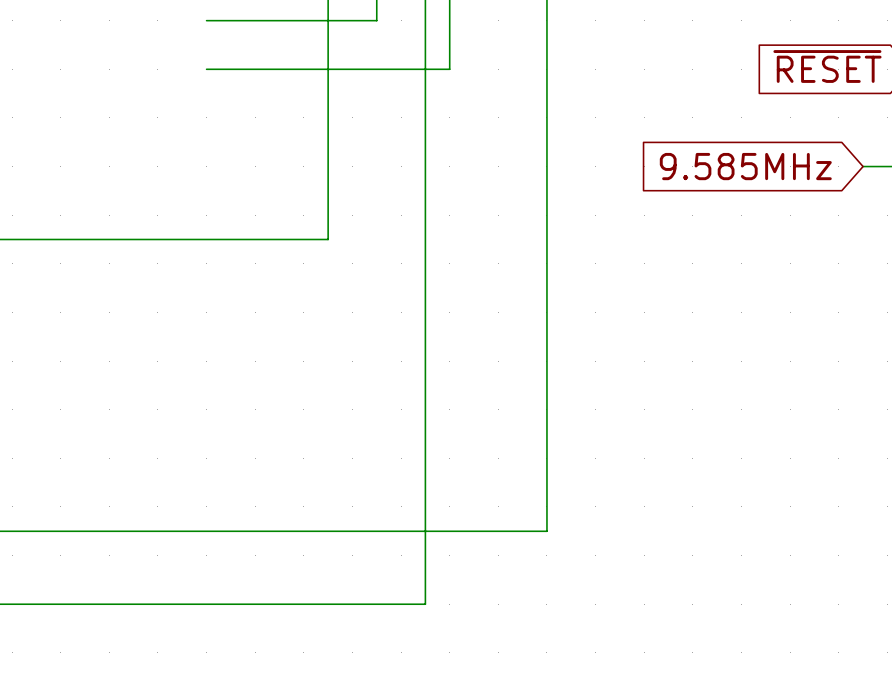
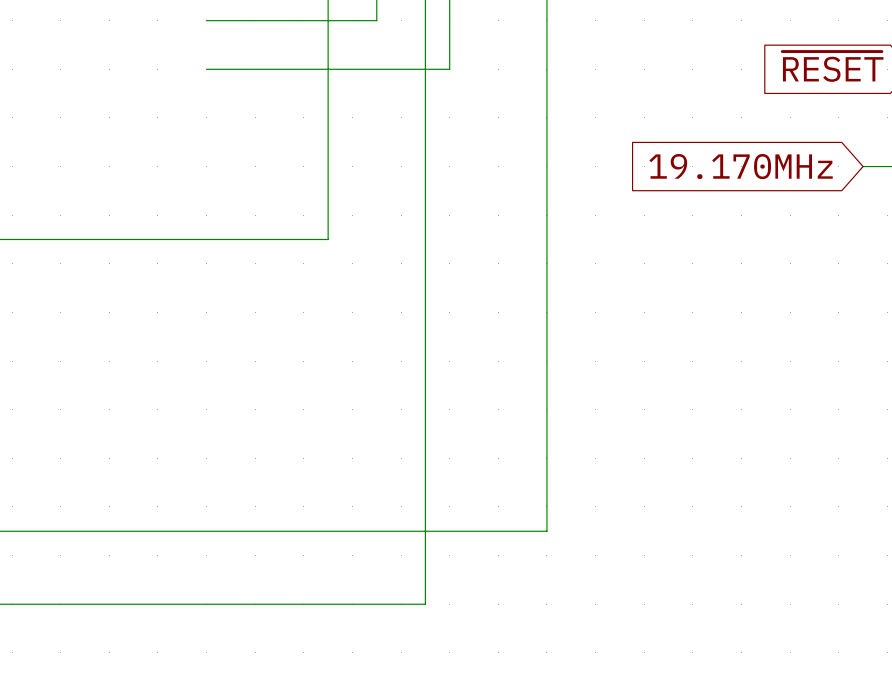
global label: 9.585MHz (745, 166) -> 19.170MHz (741, 166)

